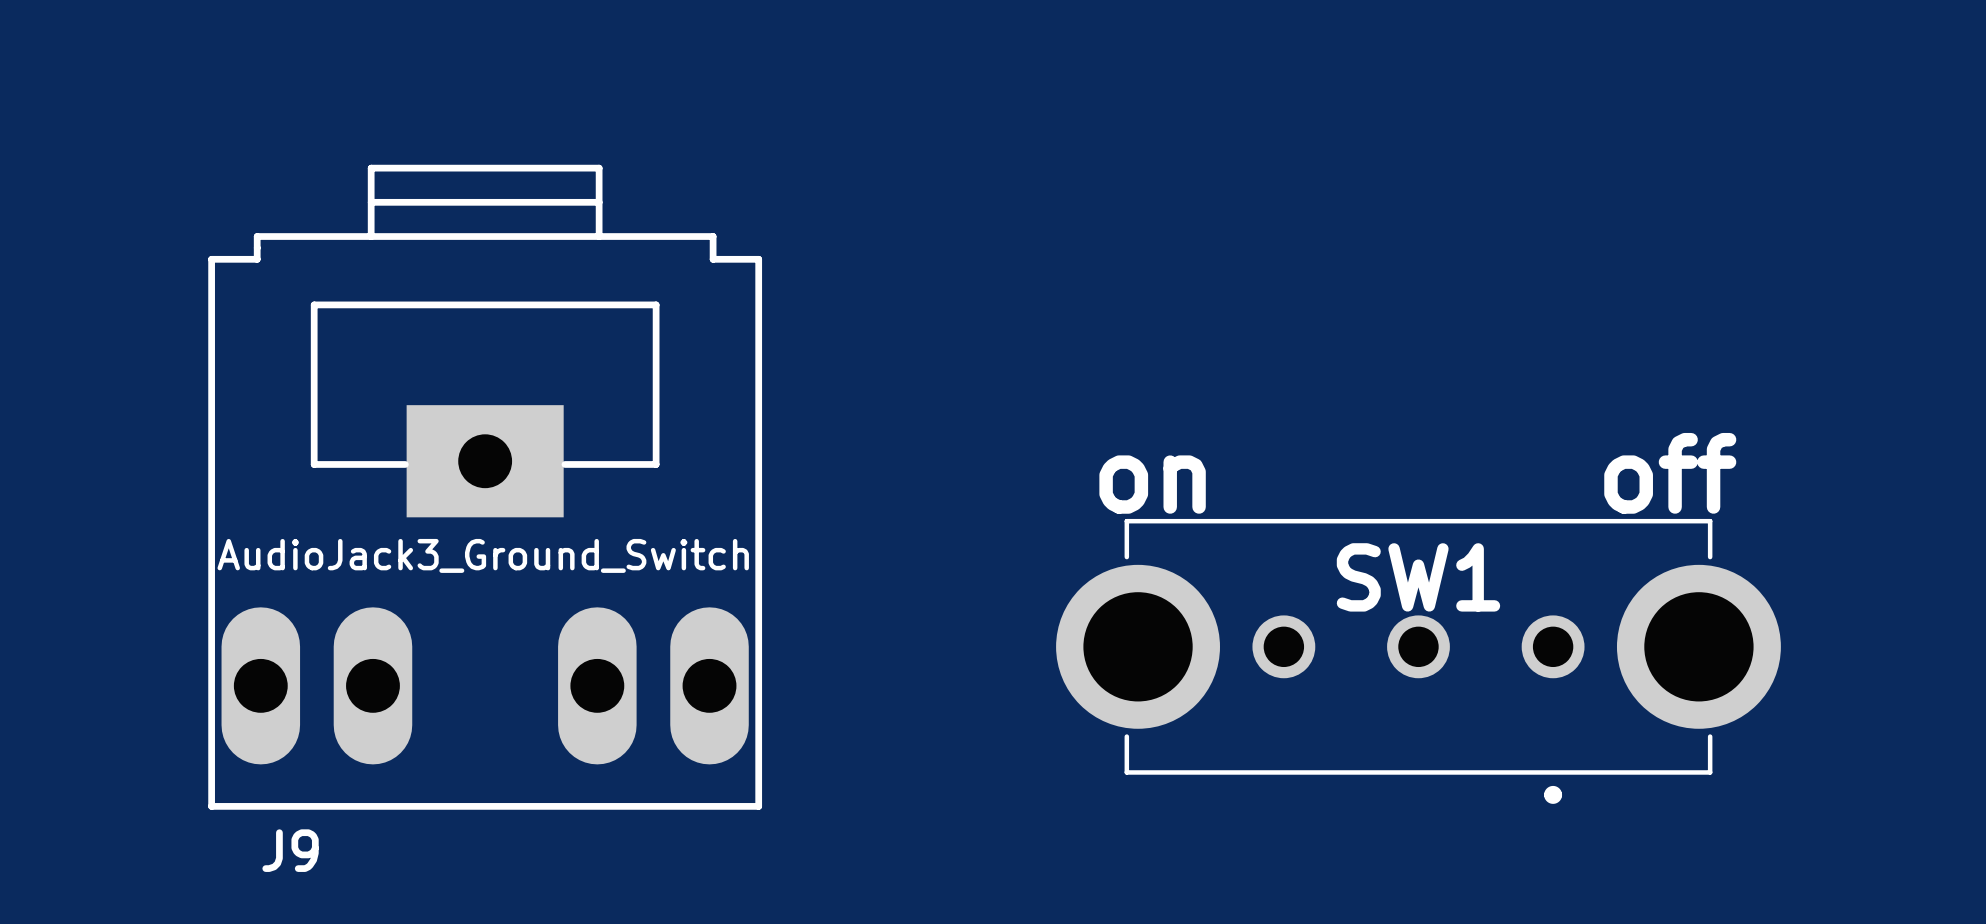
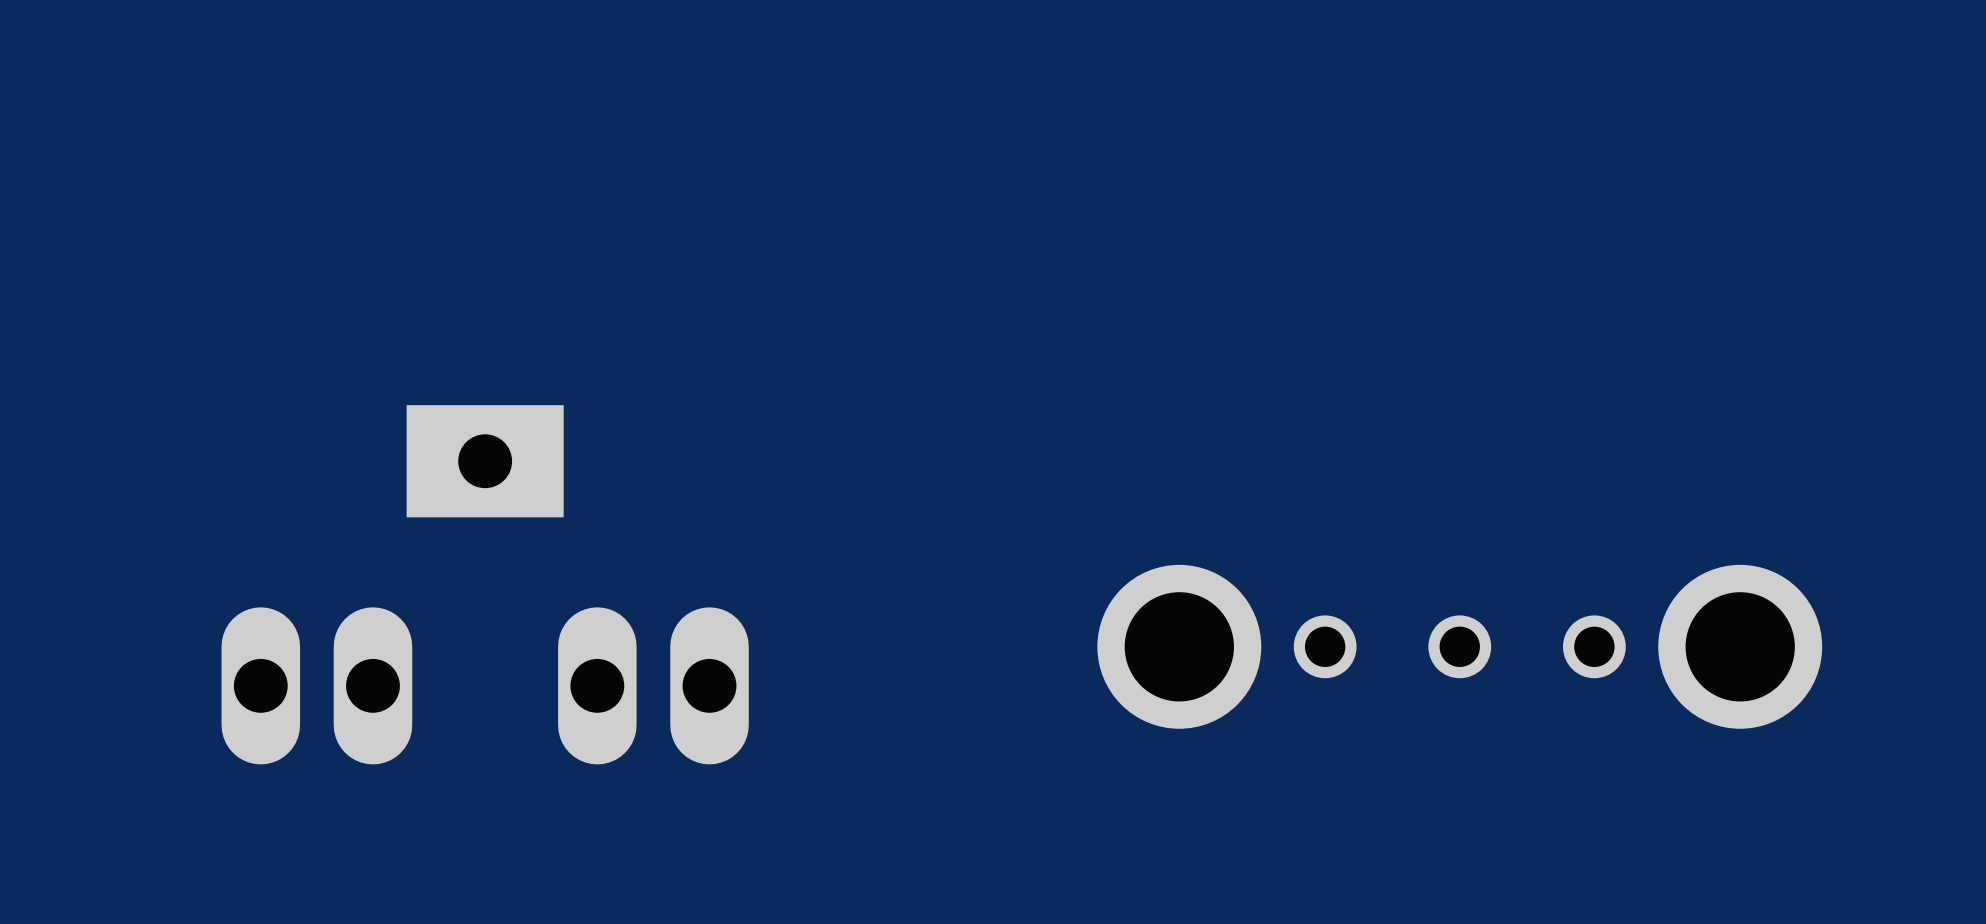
text: off (1670, 473) -> none
text: on (1152, 484) -> none
J9 side: bottom (485, 487) -> top (485, 584)
SW1 side: bottom (1418, 661) -> top (1459, 646)

